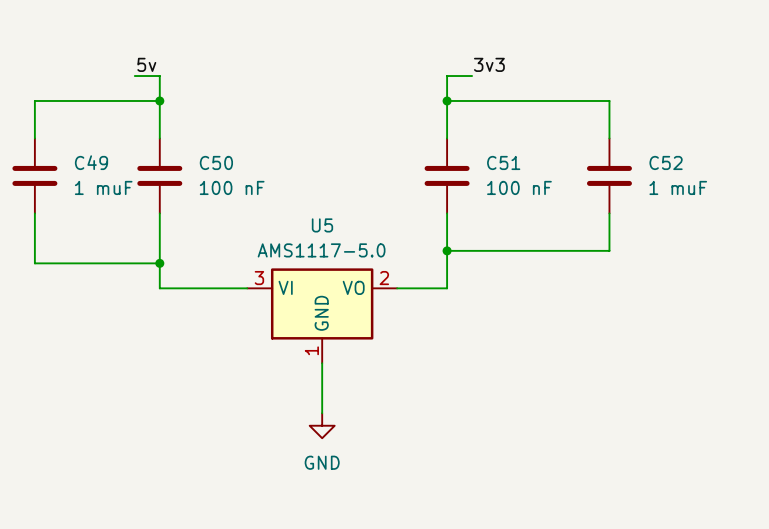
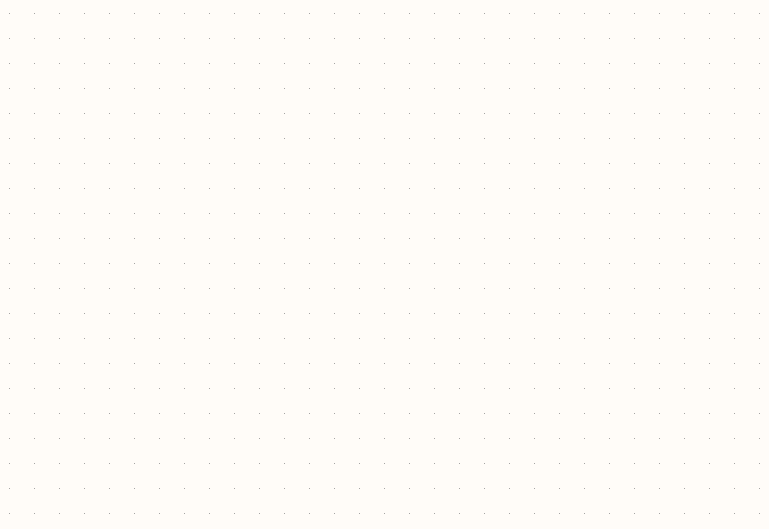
label: 5v (146, 64) -> none
label: 3v3 (489, 64) -> none
wire: (134, 76) (159, 76) (159, 138) -> none
wire: (472, 76) (447, 76) (447, 138) -> none
wire: (159, 100) (34, 100) (34, 138) -> none
junction: (159, 100) -> none
wire: (447, 100) (609, 100) (609, 138) -> none
junction: (447, 100) -> none
C49: 1 muF (34, 175) -> none
C50: 100 nF (159, 175) -> none
C51: 100 nF (447, 175) -> none
C52: 1 muF (609, 175) -> none
wire: (34, 213) (34, 263) (159, 263) -> none
wire: (159, 213) (159, 288) (247, 288) -> none
wire: (447, 213) (447, 288) (397, 288) -> none
wire: (609, 213) (609, 250) (447, 250) -> none
junction: (447, 250) -> none
junction: (159, 263) -> none
U5: AMS1117-5.0 (322, 315) -> none
wire: (322, 363) (322, 413) -> none
power symbol: GND (322, 425) -> none

